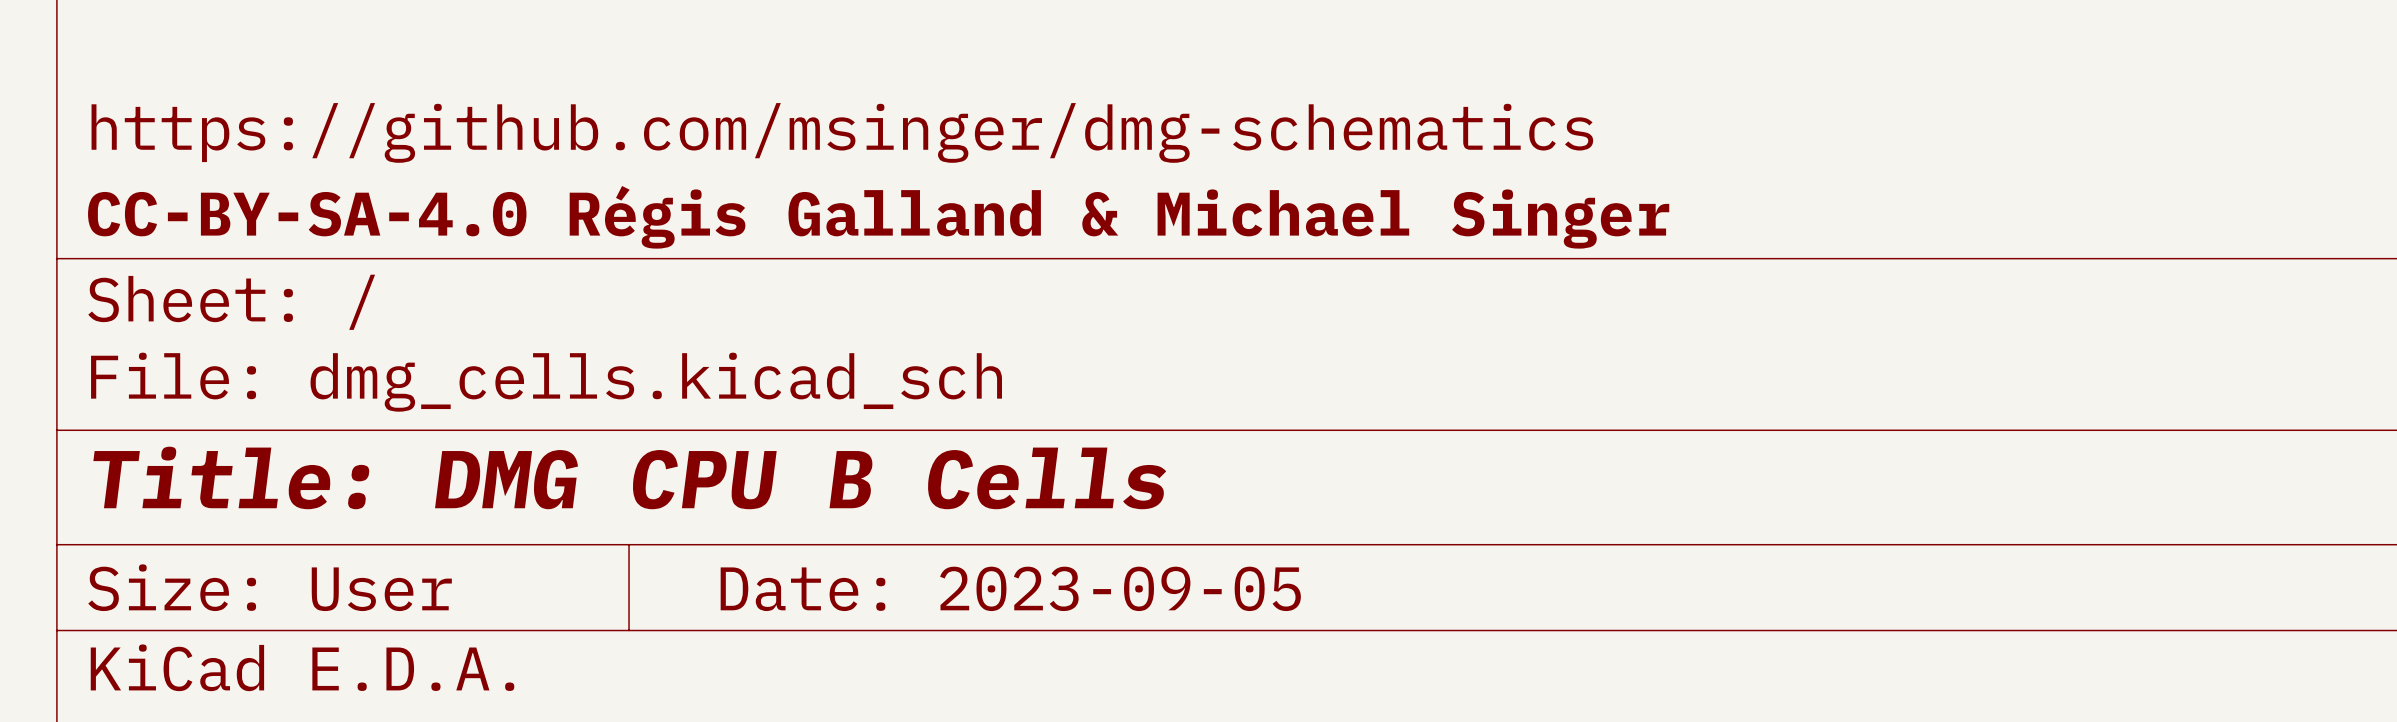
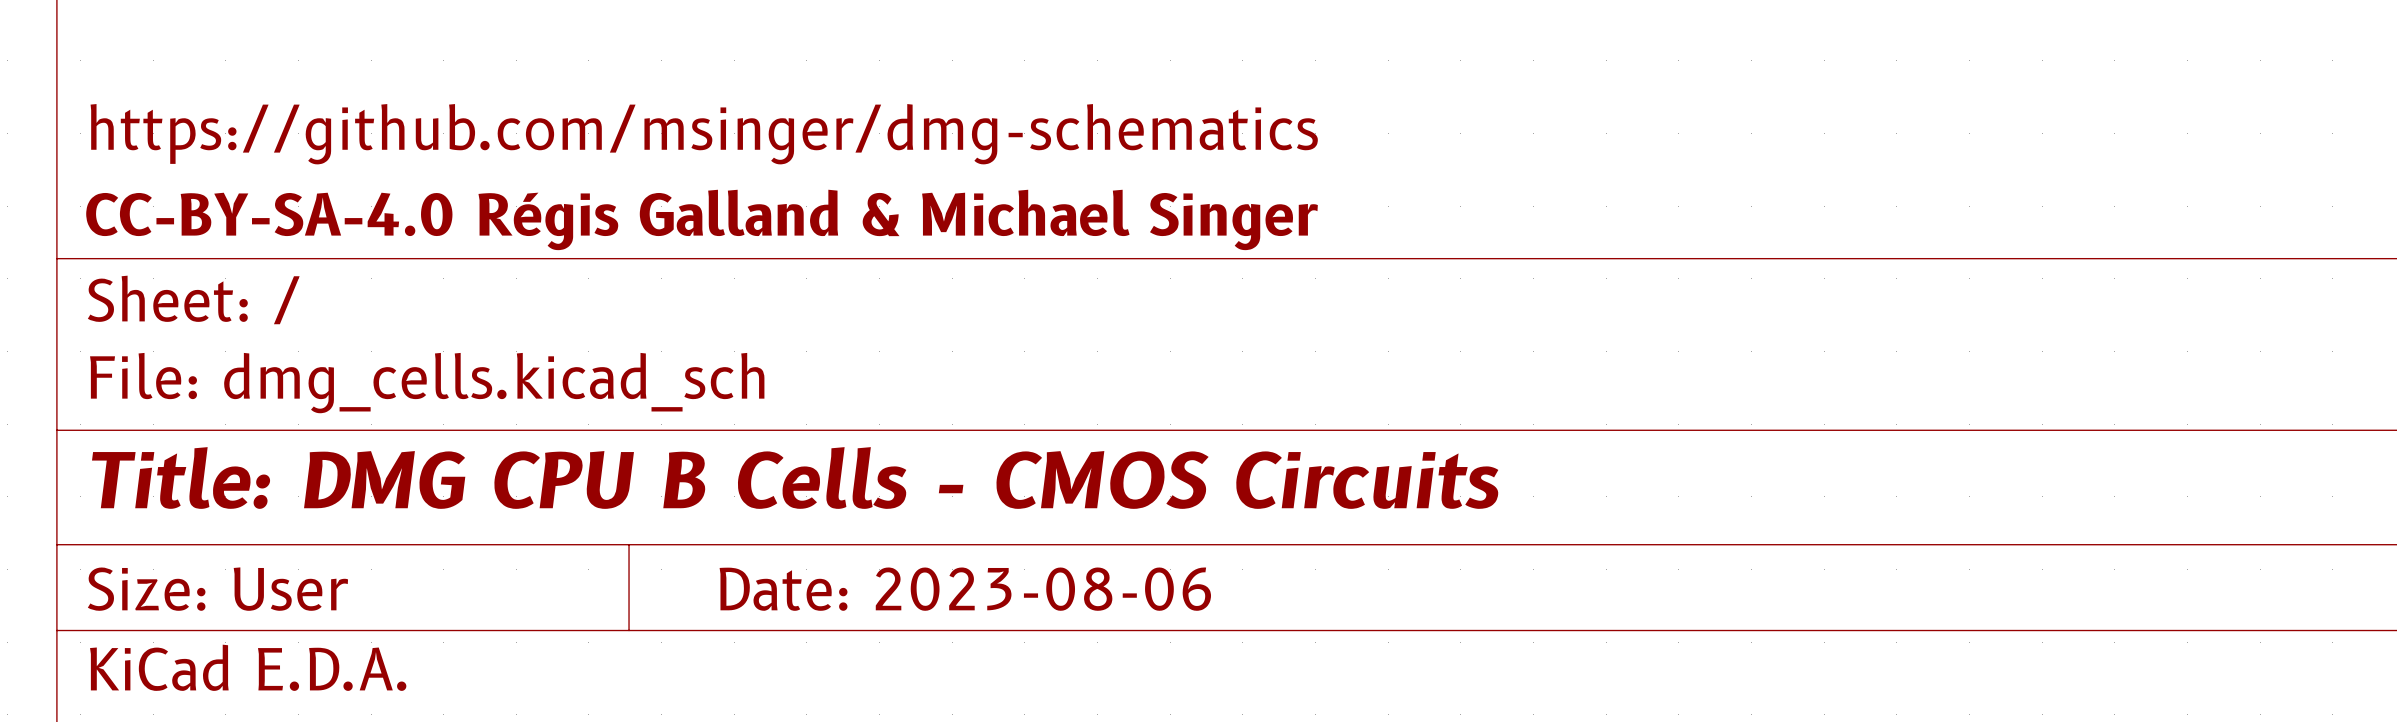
title block: Title: DMG CPU B Cells (629, 477) -> Title: DMG CPU B Cells - CMOS Circuits (795, 478)
title block: Date: 2023-09-05 (1010, 588) -> Date: 2023-08-06 (965, 589)

